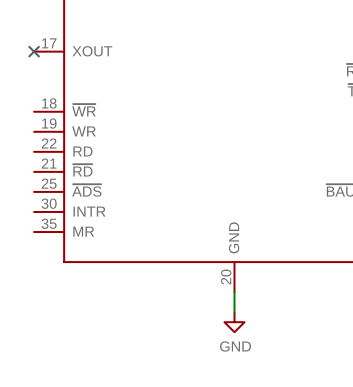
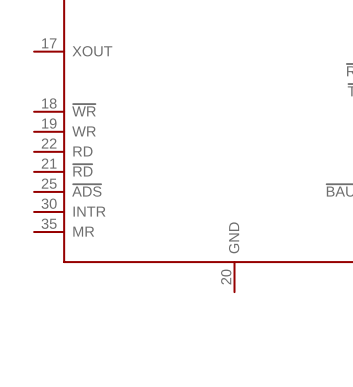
no-connect mark: (34, 51) -> none
wire: (234, 292) (234, 312) -> none
power symbol: GND (234, 322) -> none

